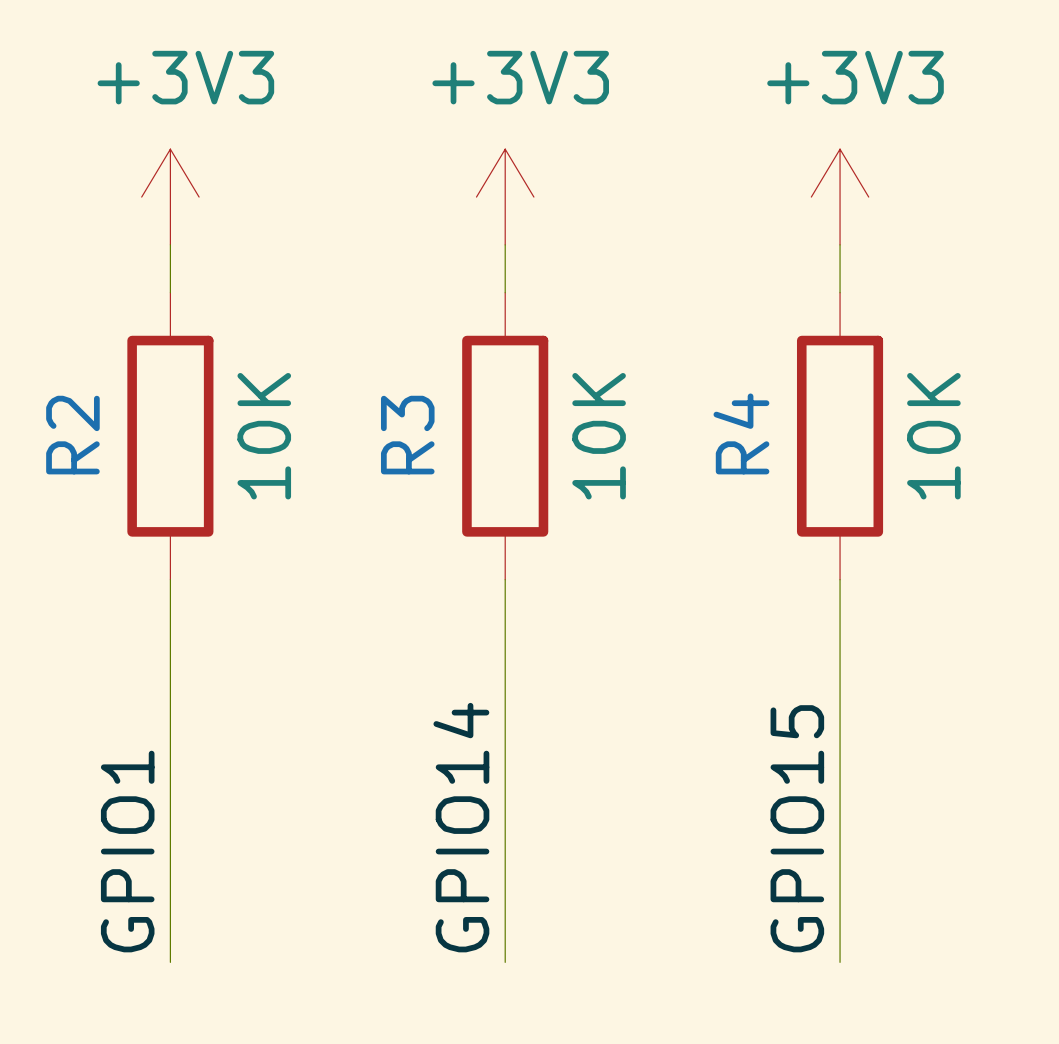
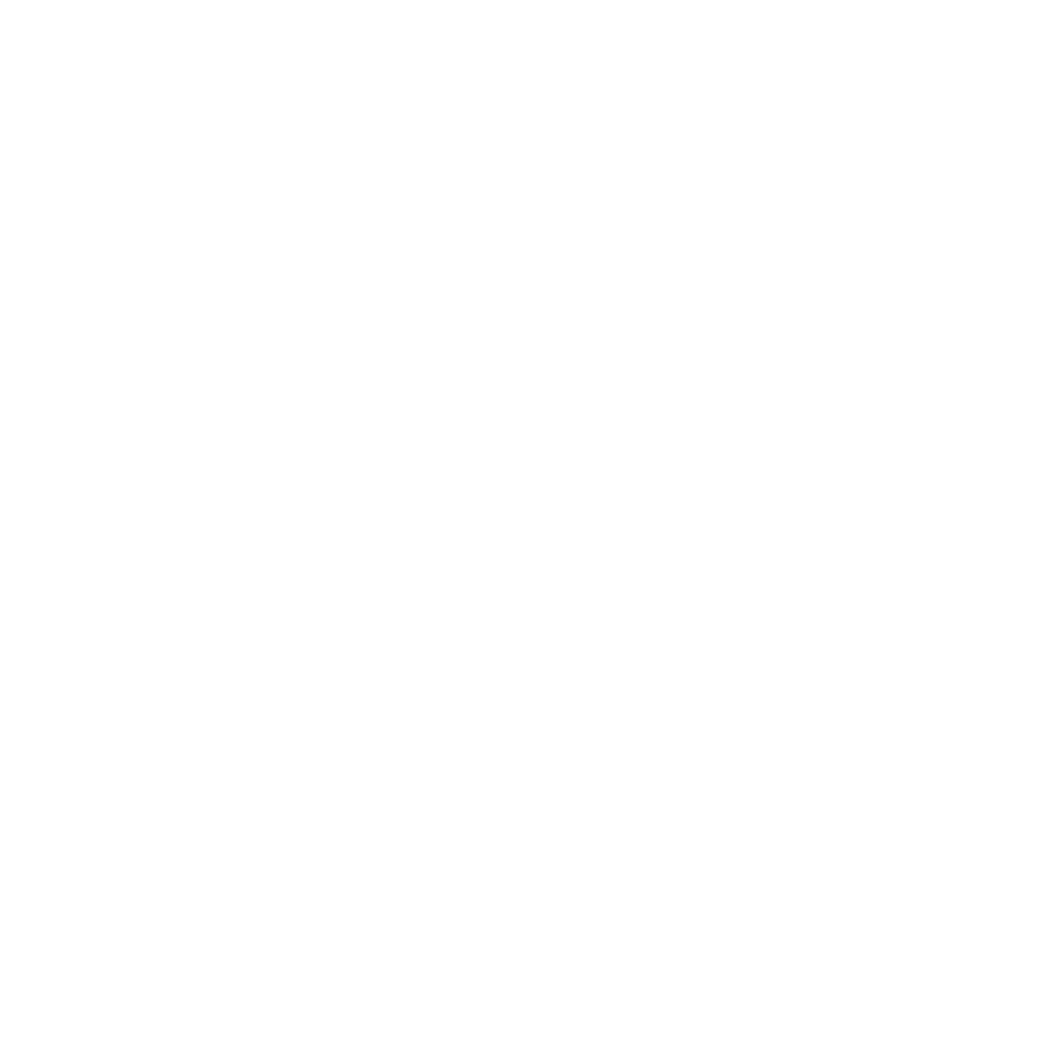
power symbol: +3V3 (170, 197) -> none
power symbol: +3V3 (505, 197) -> none
power symbol: +3V3 (840, 197) -> none
wire: (170, 244) (170, 292) -> none
wire: (505, 244) (505, 292) -> none
wire: (840, 244) (840, 292) -> none
R2: 10K (170, 436) -> none
R3: 10K (505, 436) -> none
R4: 10K (840, 436) -> none
wire: (170, 579) (170, 962) -> none
wire: (505, 579) (505, 962) -> none
wire: (840, 579) (840, 962) -> none
label: GPIO14 (461, 827) -> none
label: GPIO15 (797, 828) -> none
label: GPIO1 (127, 851) -> none

